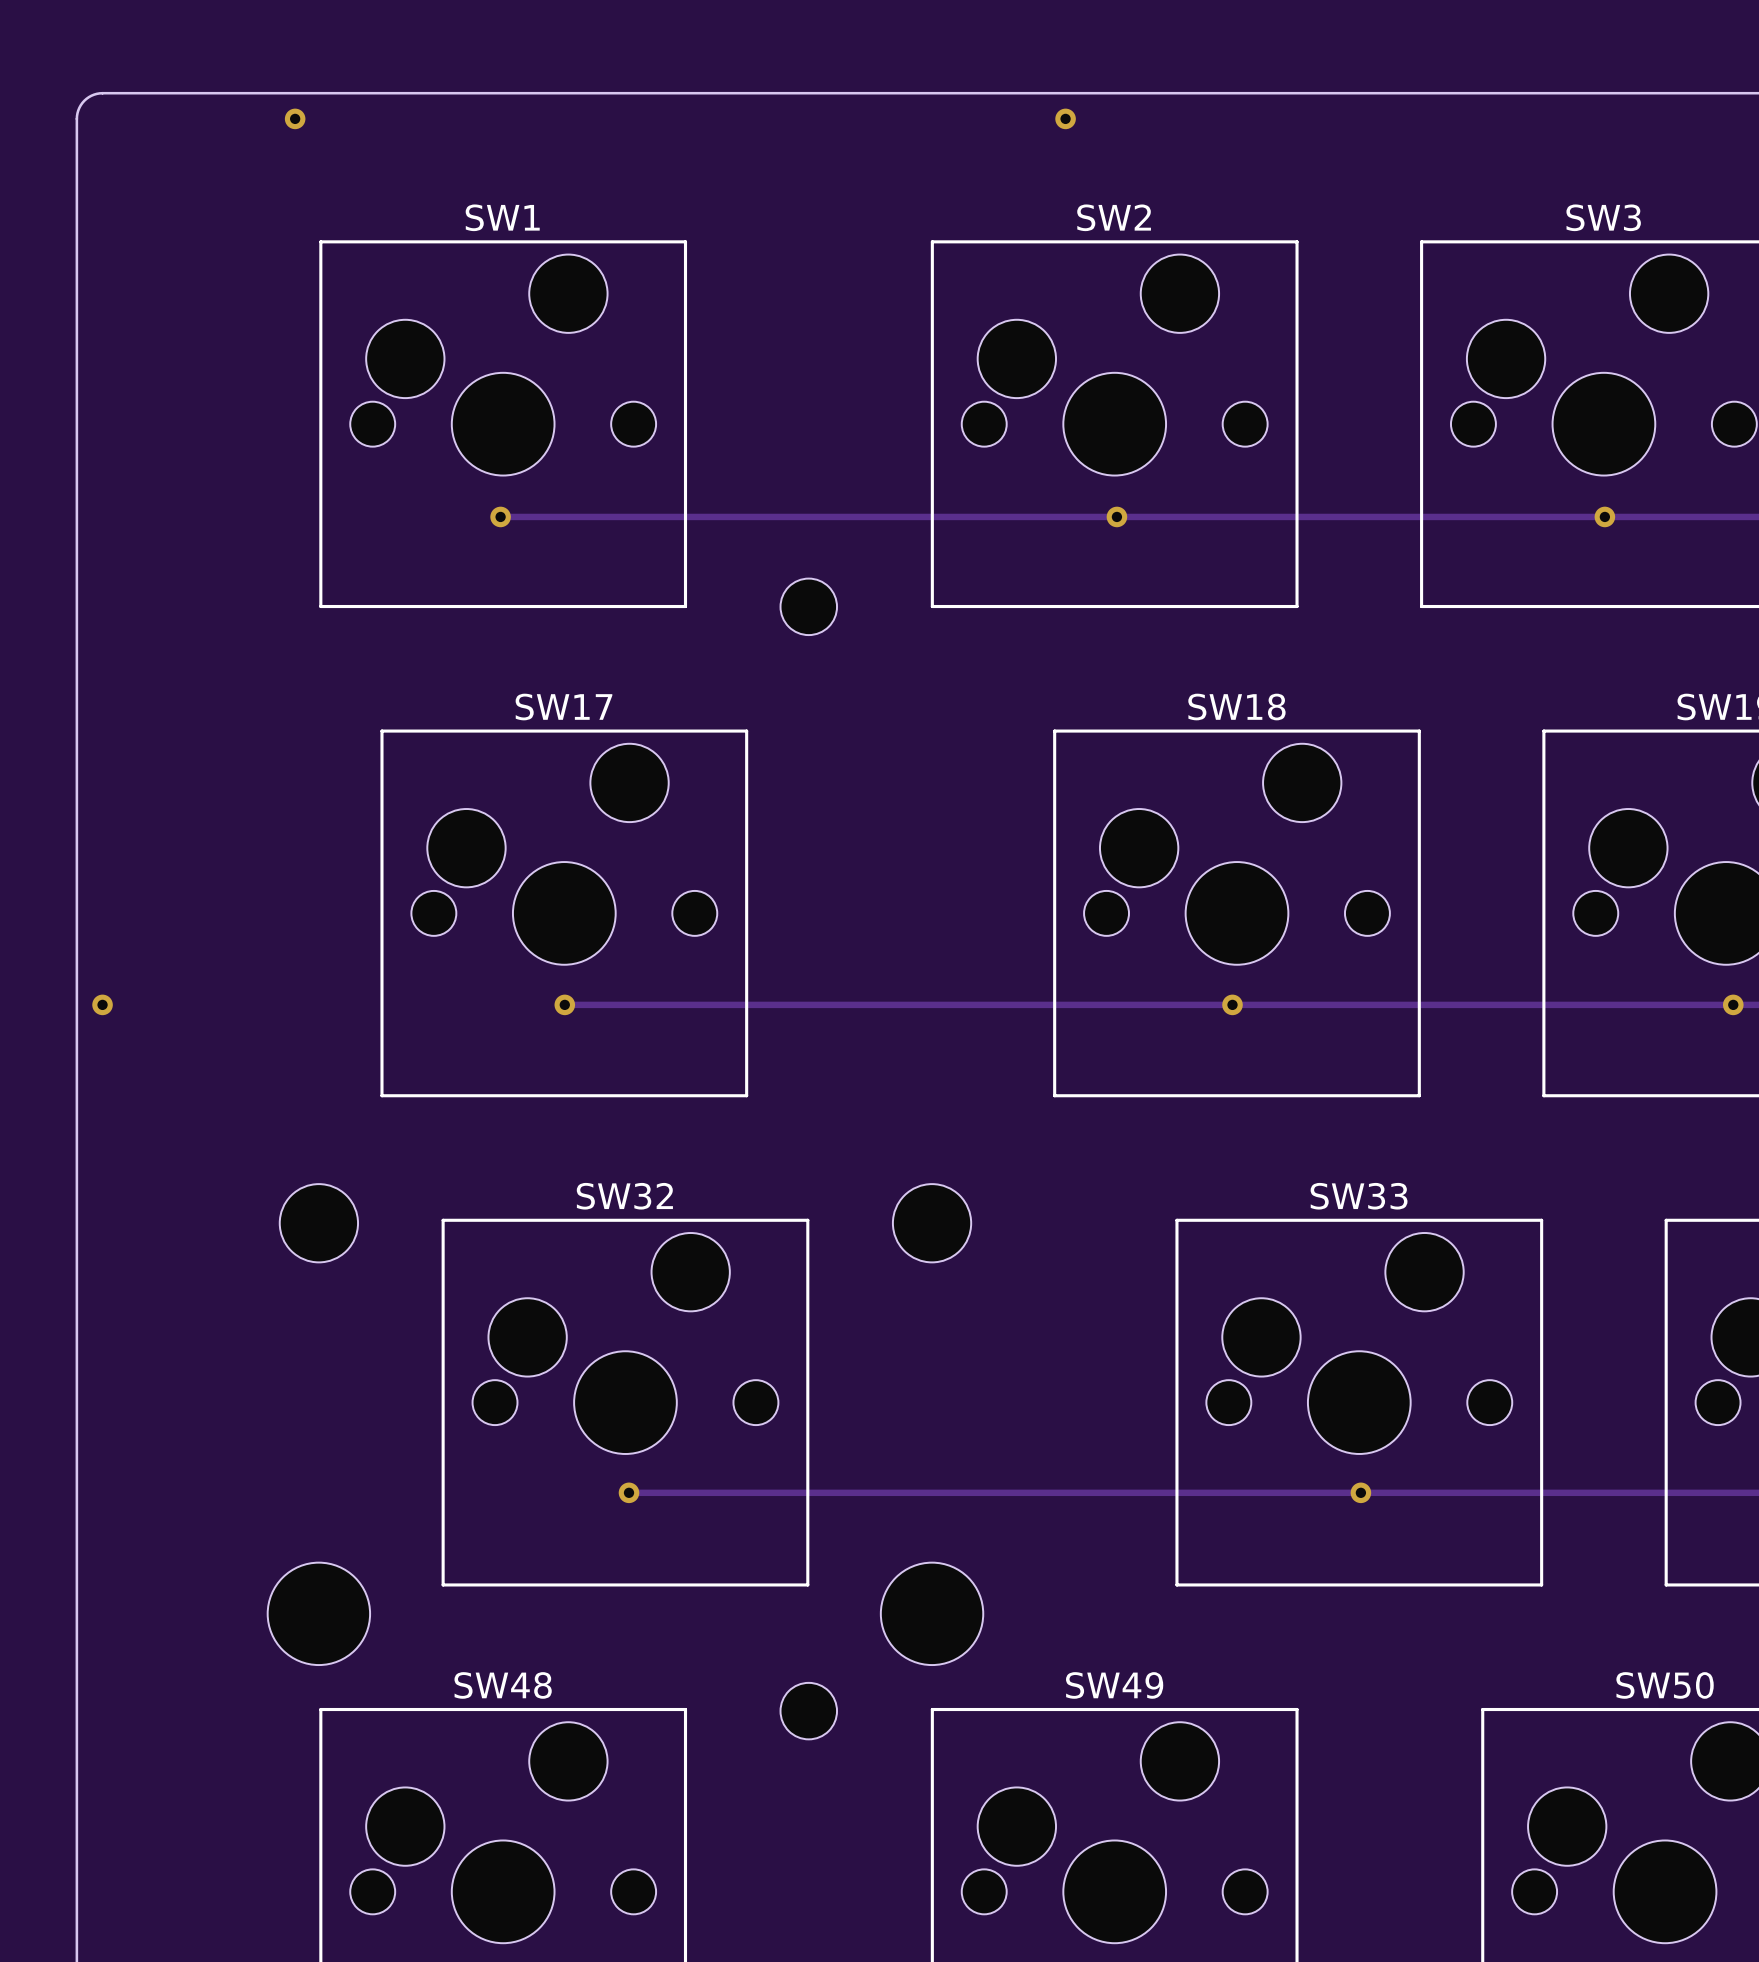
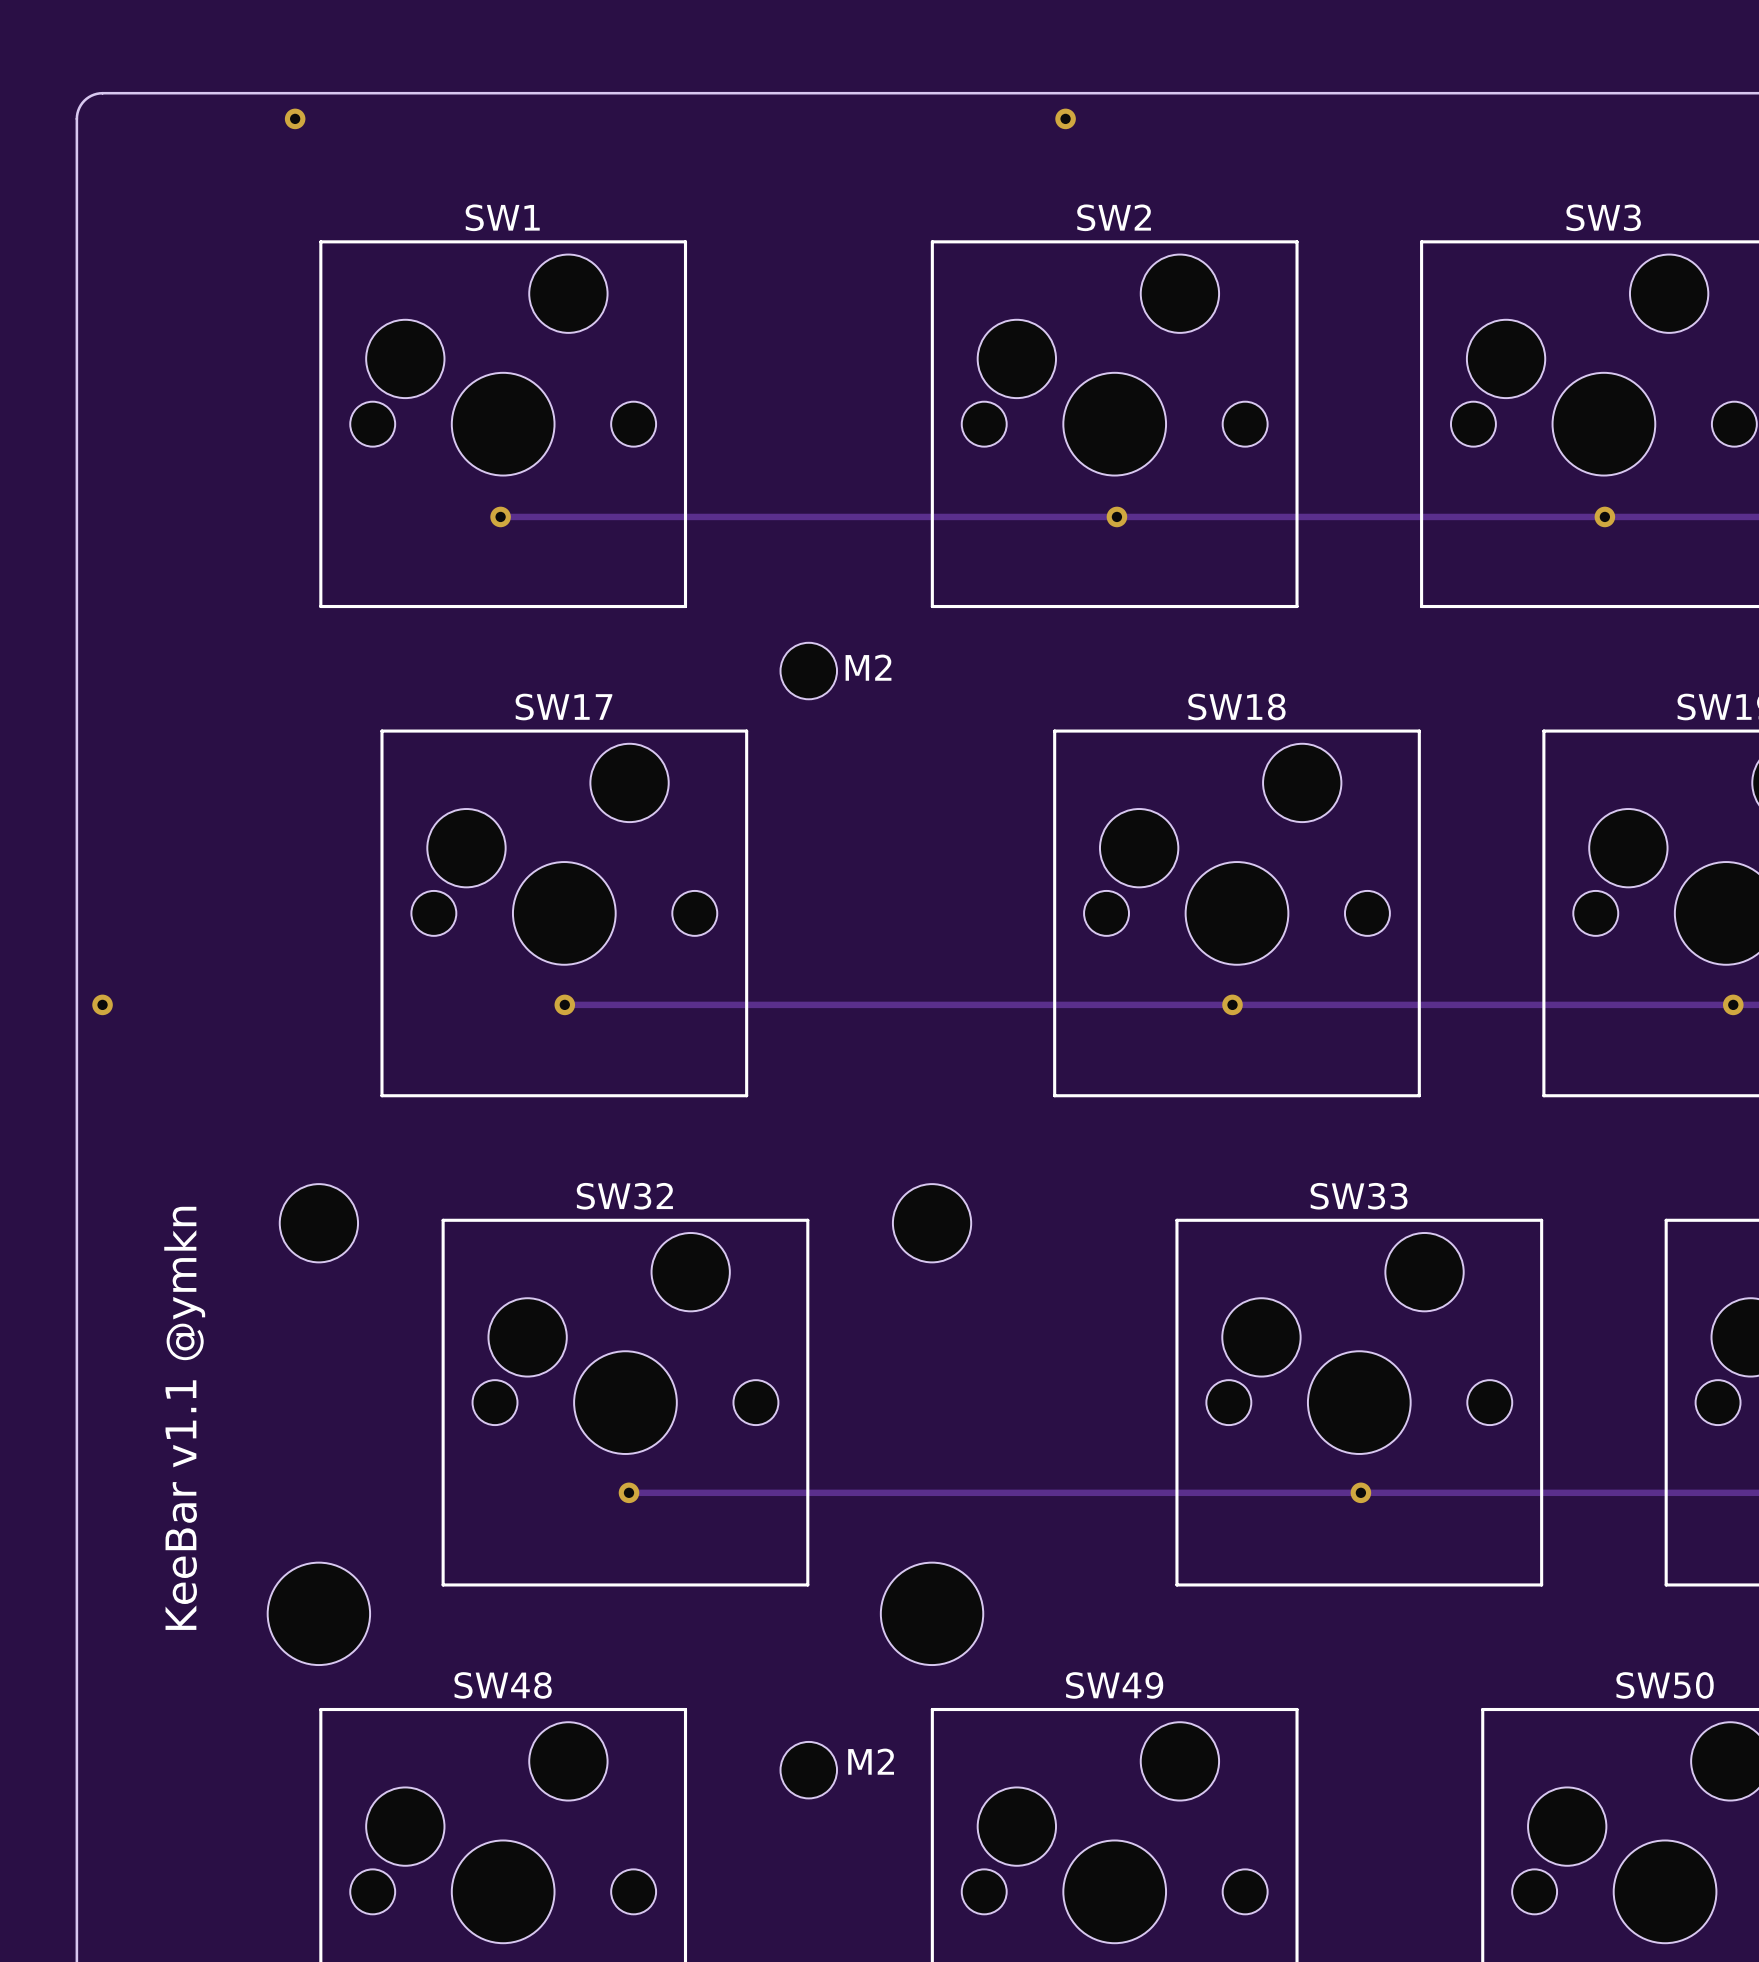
part position: (808, 606) -> (808, 671)
text: none -> M2 (868, 667)
text: none -> KeeBar v1.1 @ymkn (184, 1418)
part position: (808, 1711) -> (808, 1770)
text: none -> M2 (871, 1761)

